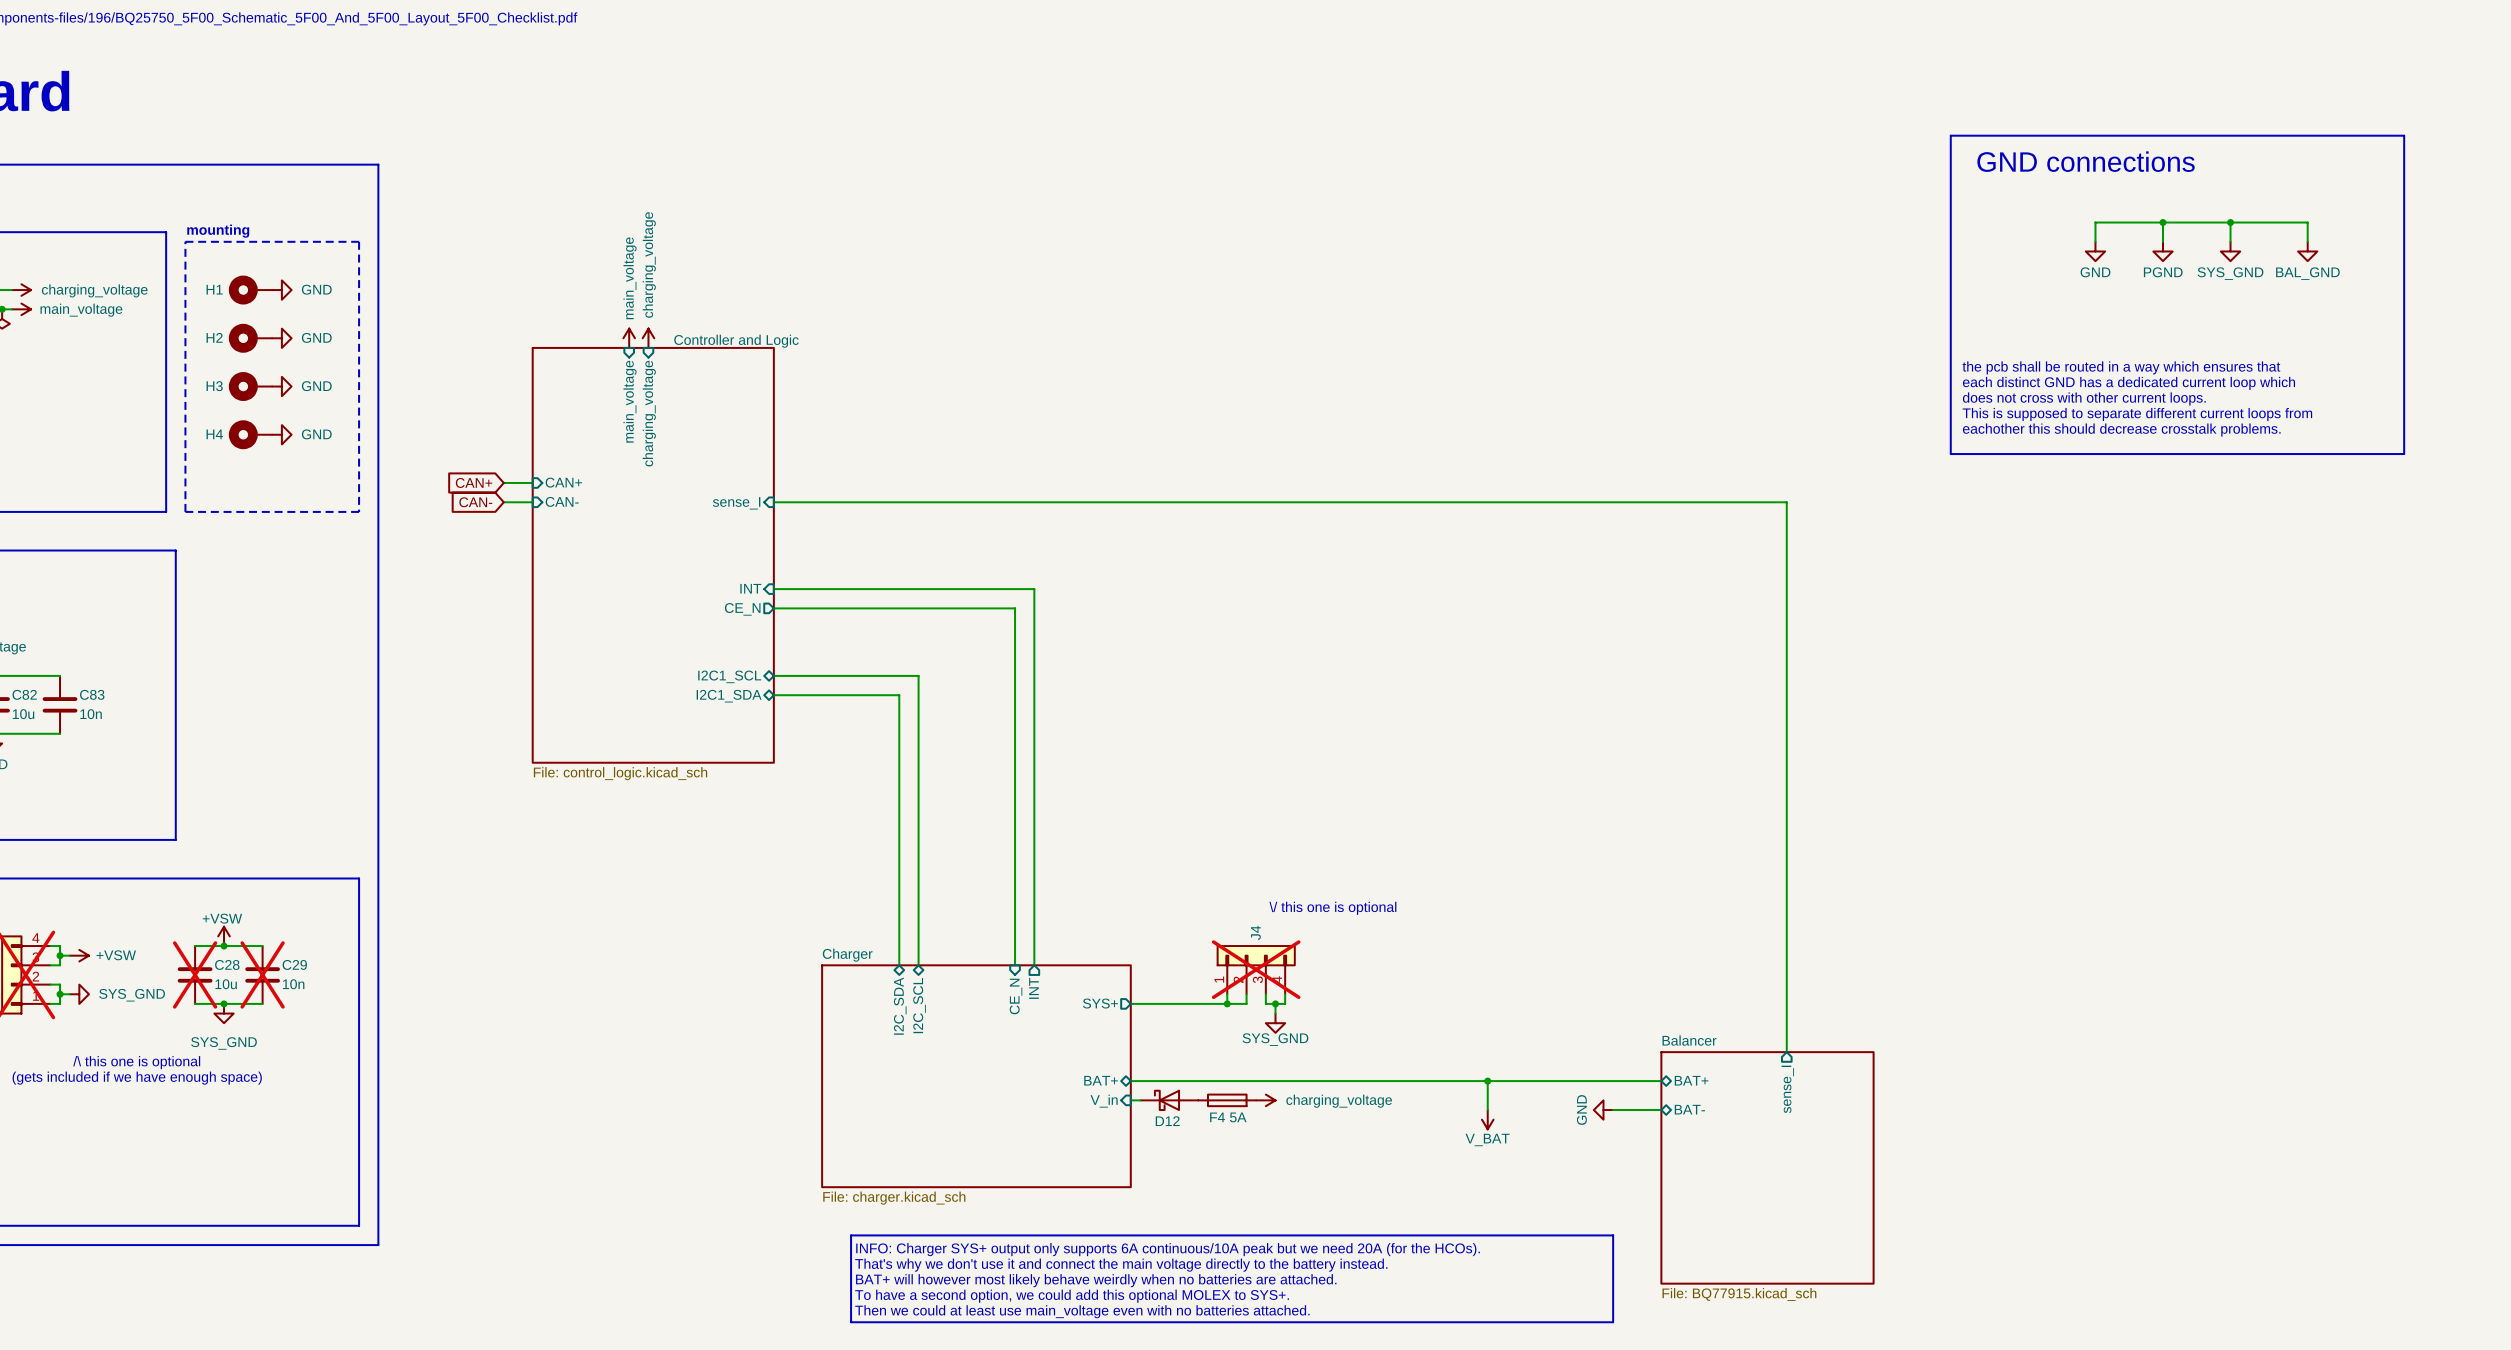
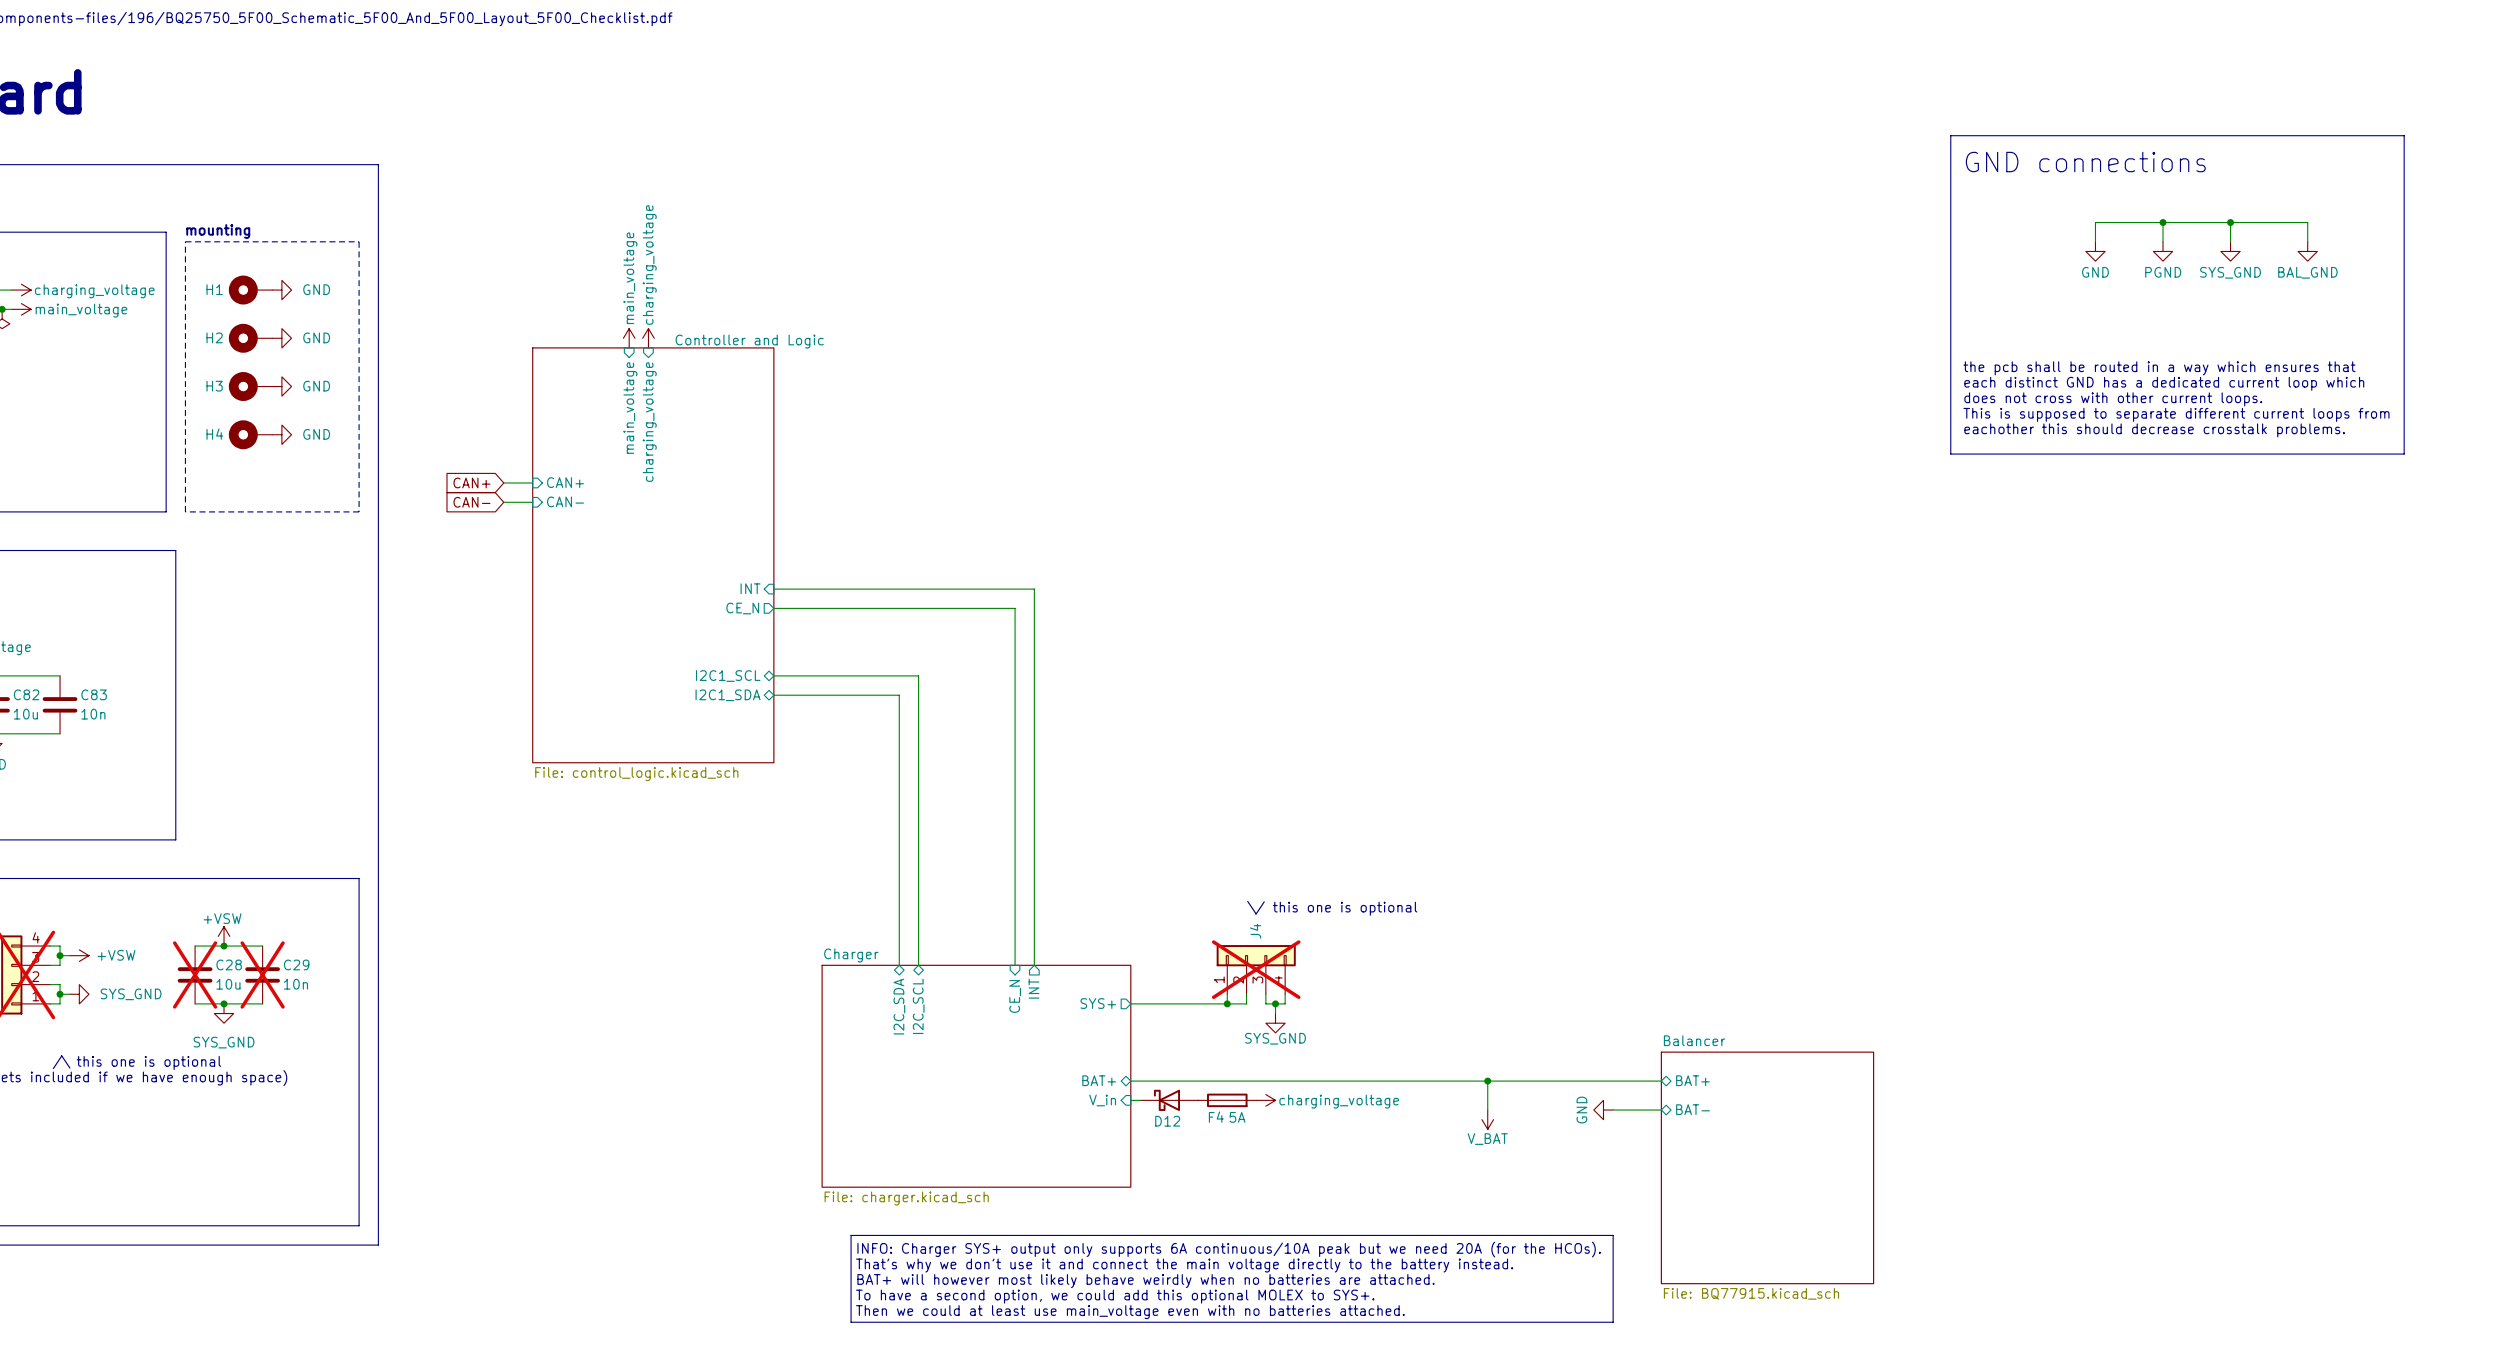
wire: (773, 502) (1786, 502) (1786, 1052) -> none
sheet pin: sense_I (736, 503) -> none
sheet pin: sense_I (1787, 1089) -> none

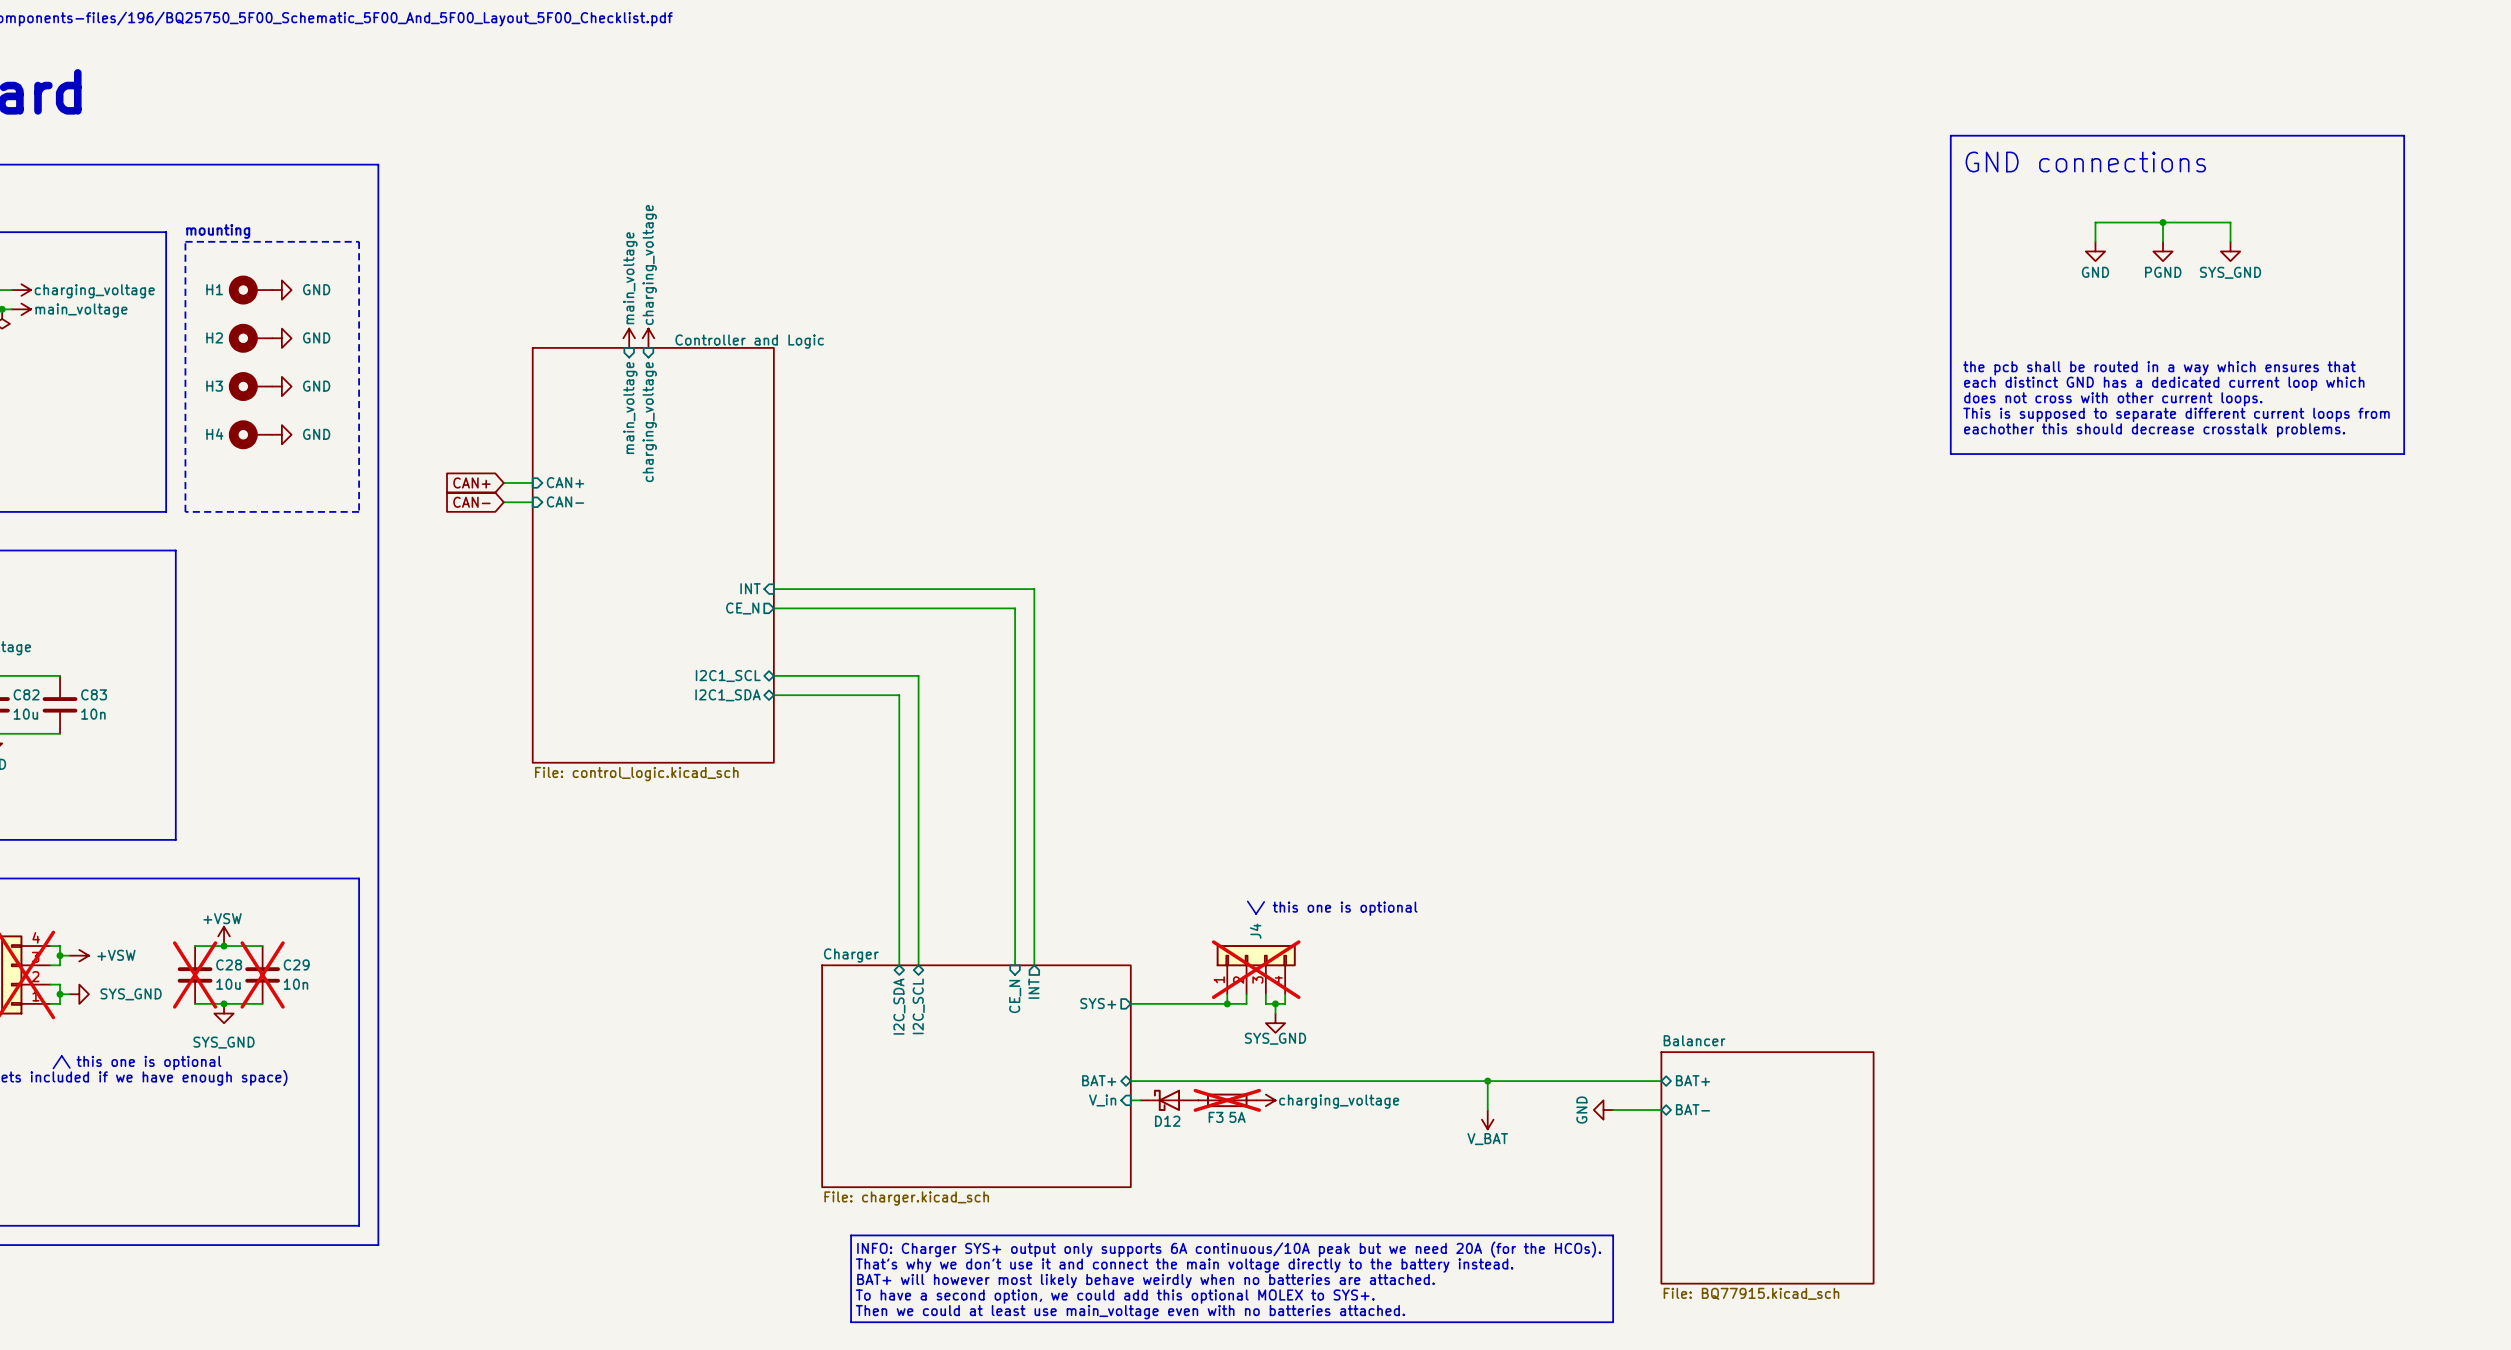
wire: (2230, 222) (2307, 222) (2307, 241) -> none
junction: (2230, 222) -> none
power symbol: BAL_GND (2307, 251) -> none
F4 do-not-place cross: none -> (1227, 1100)
F4 name: F4 (1216, 1117) -> F3 (1216, 1117)

